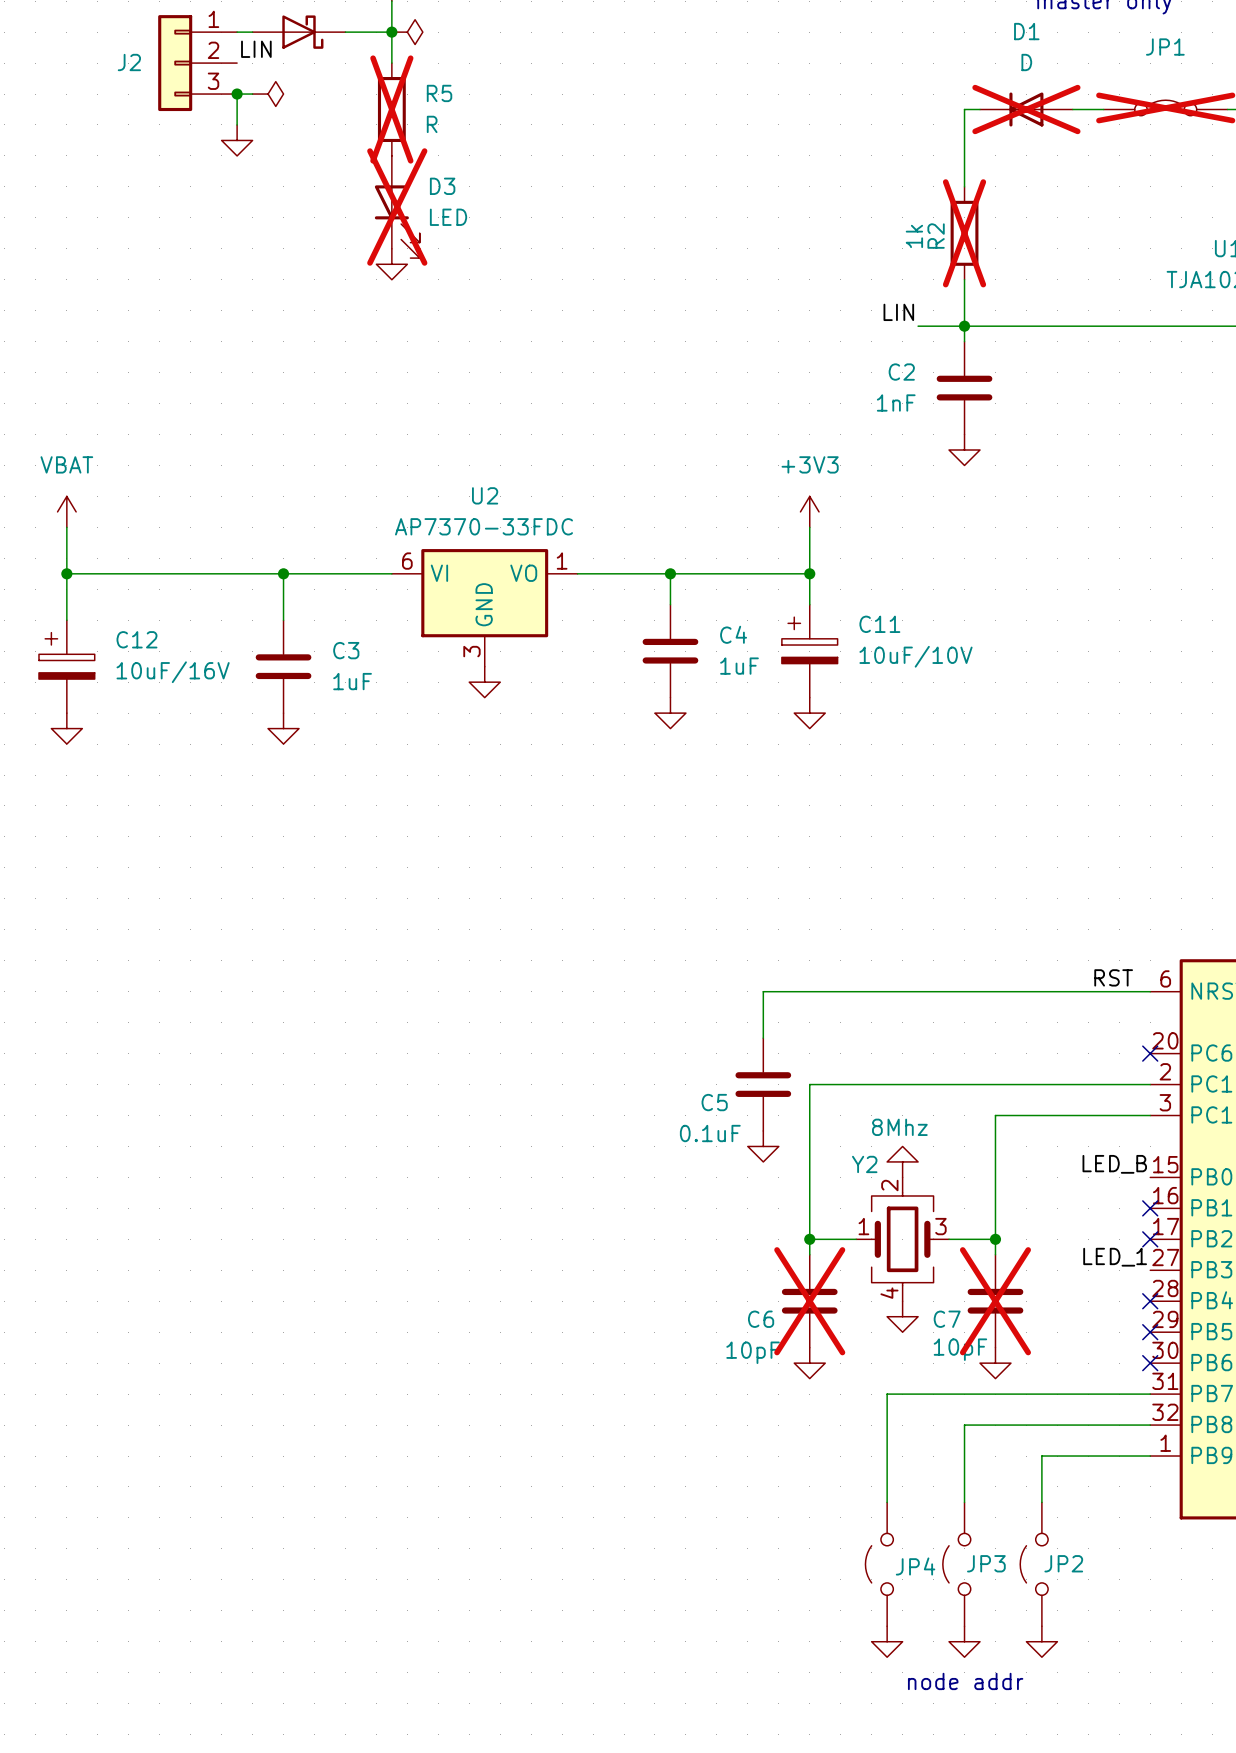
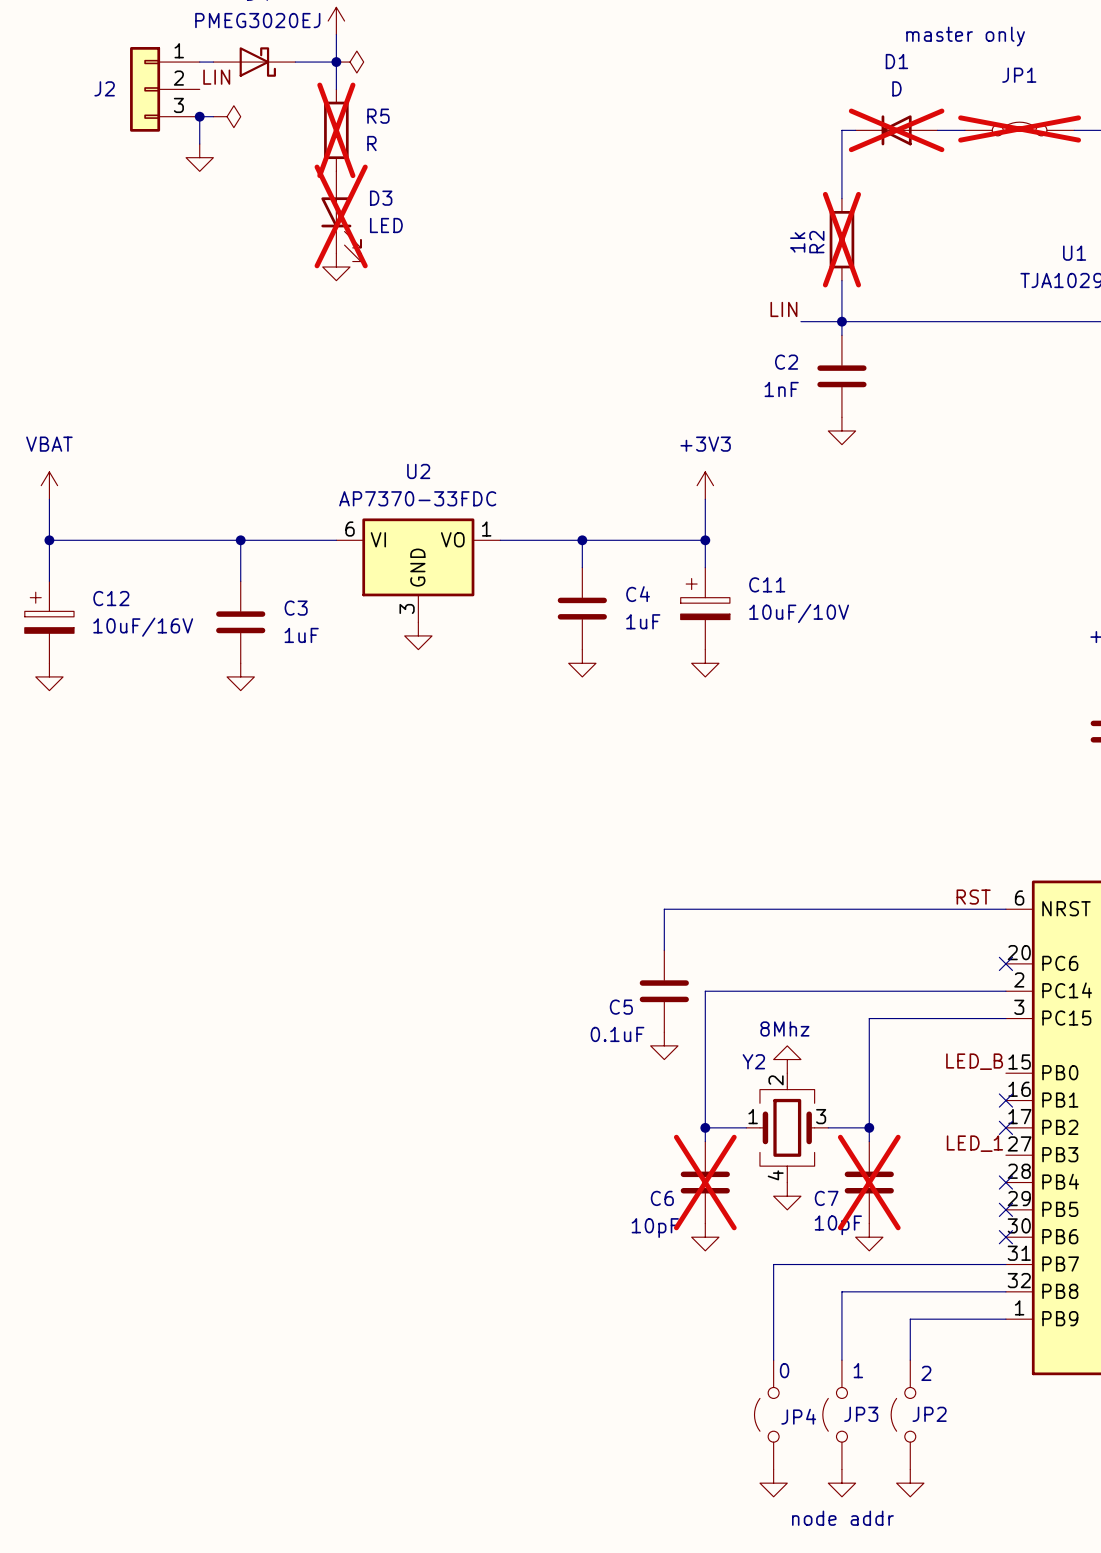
text: none -> 0 (784, 1370)
text: none -> 1 (858, 1370)
text: none -> 2 (926, 1373)

